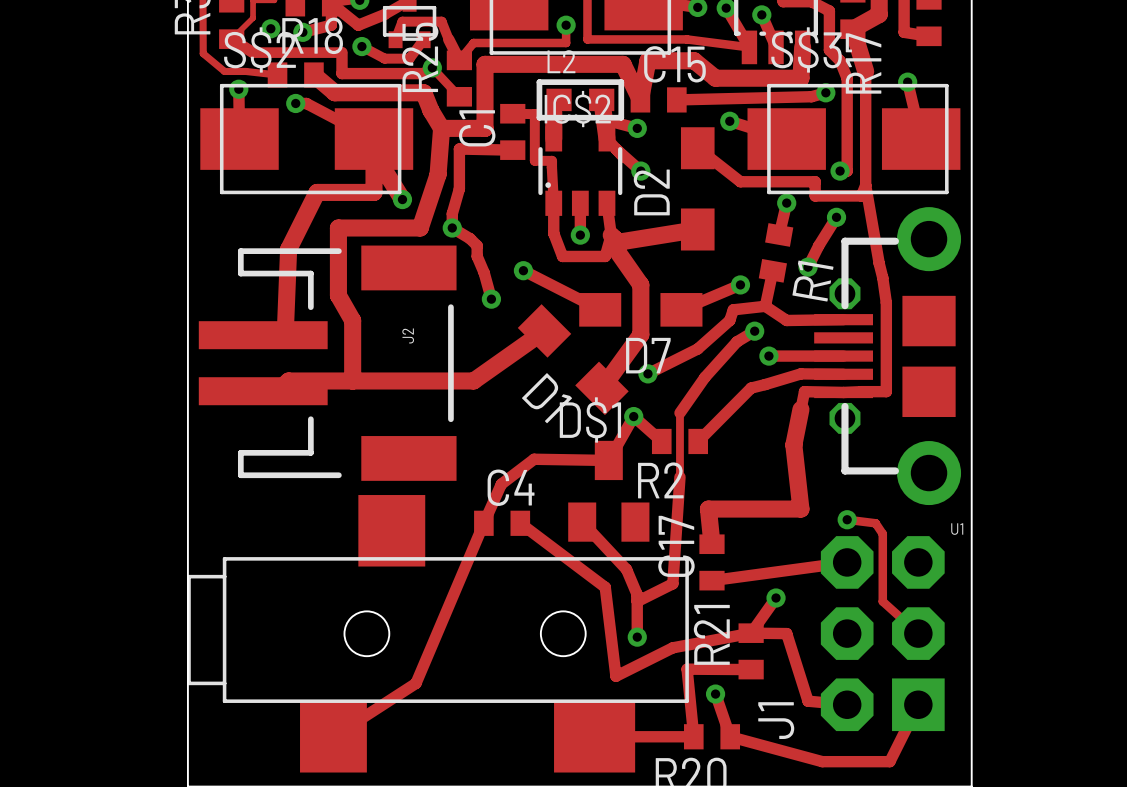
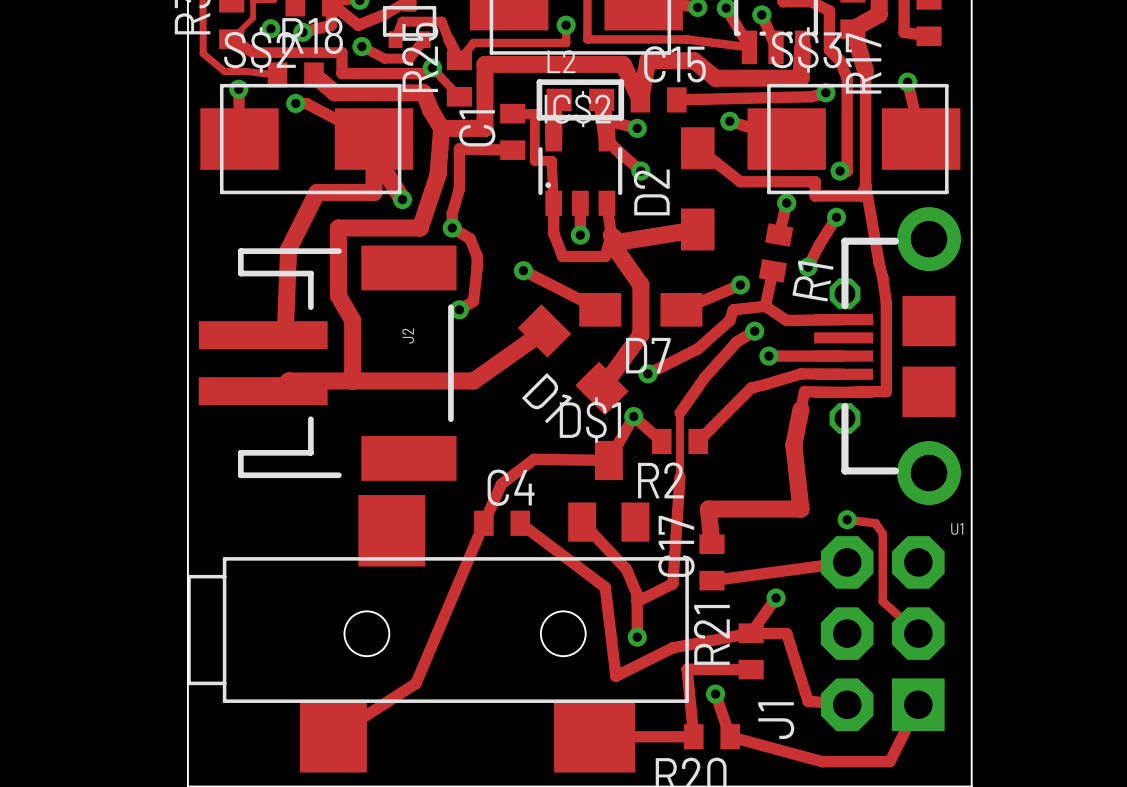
track: (470, 238) (477, 245) (477, 256) (491, 299) -> (470, 238) (477, 256) (473, 301) (459, 309)
via position: (491, 299) -> (459, 309)

